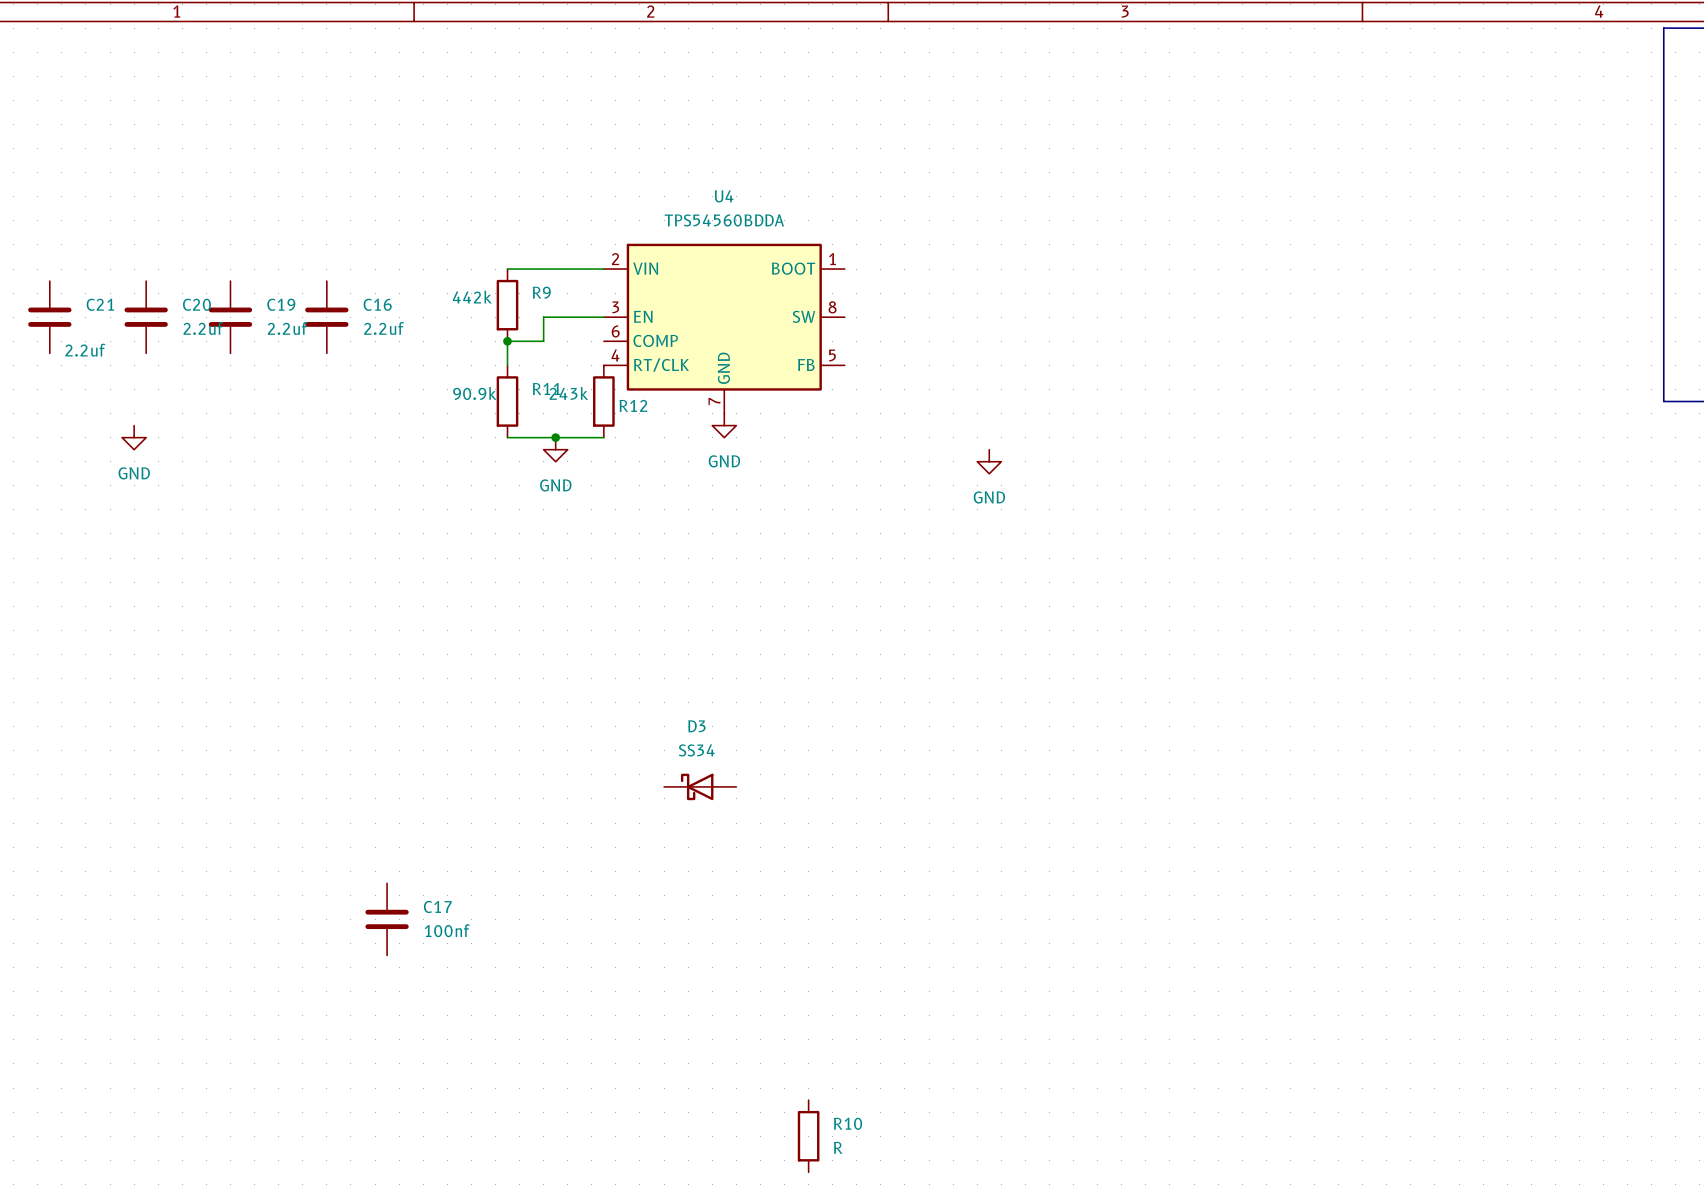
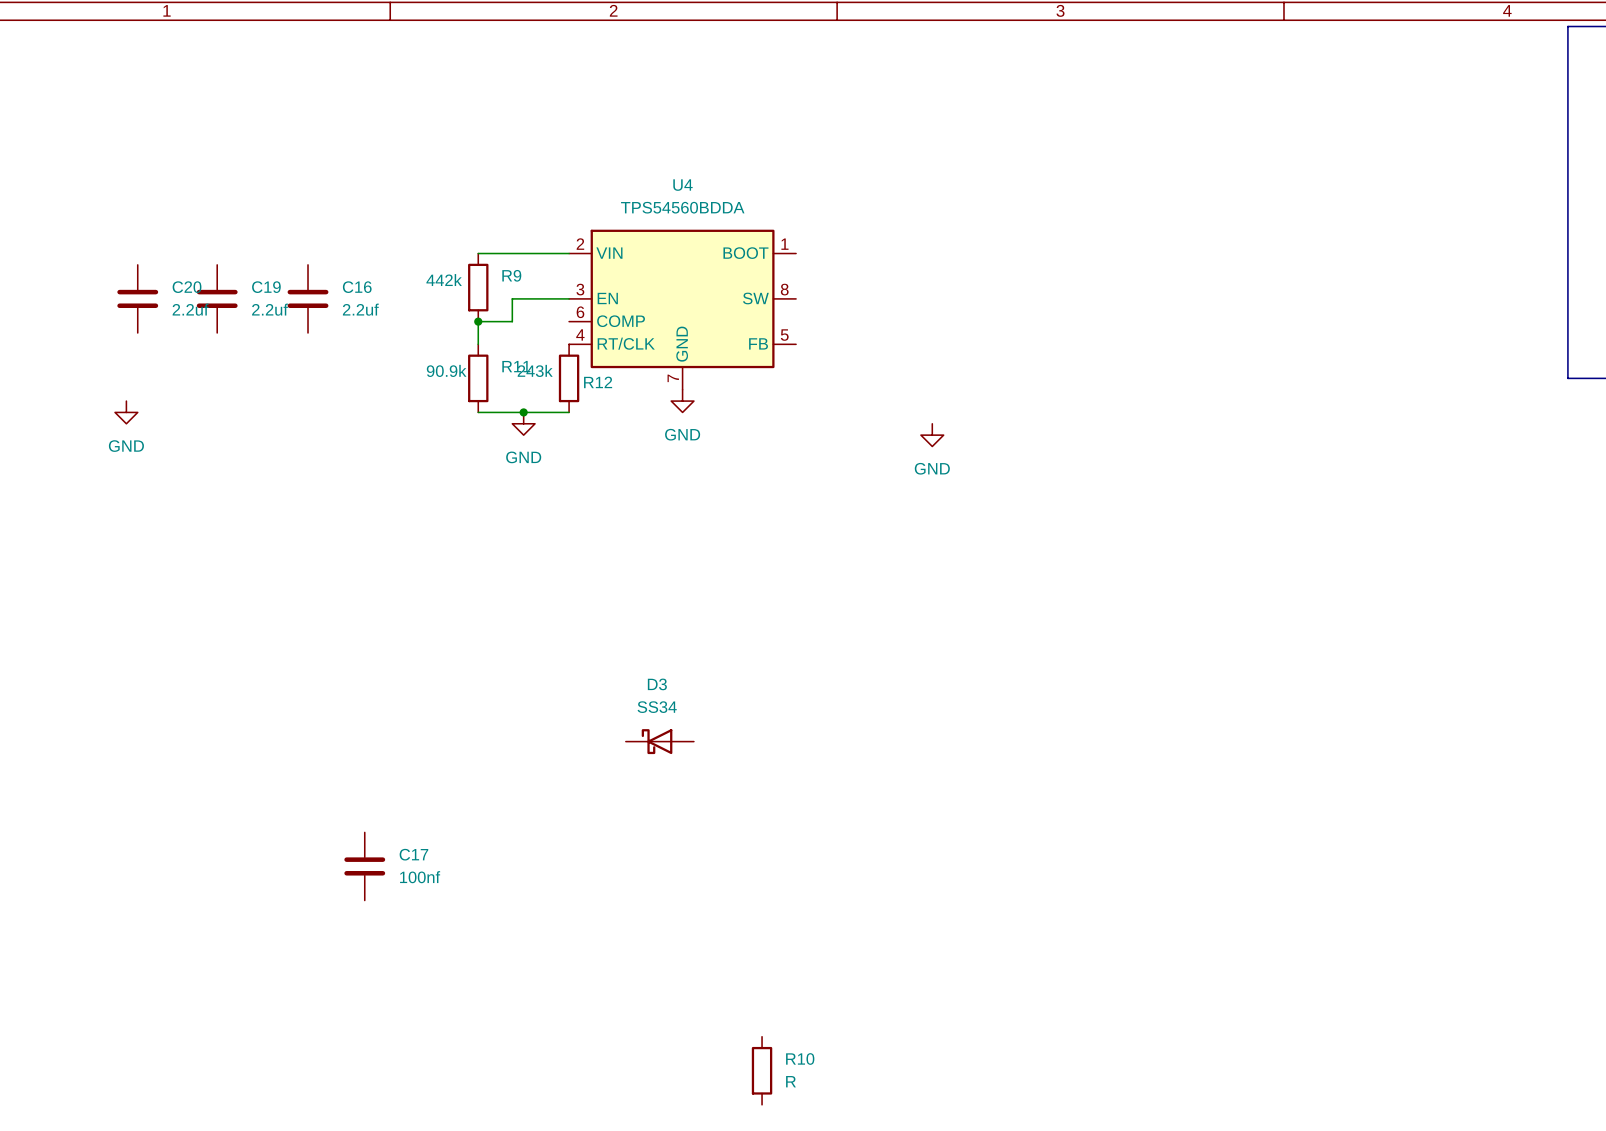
C21: 2.2uf (49, 317) -> none

